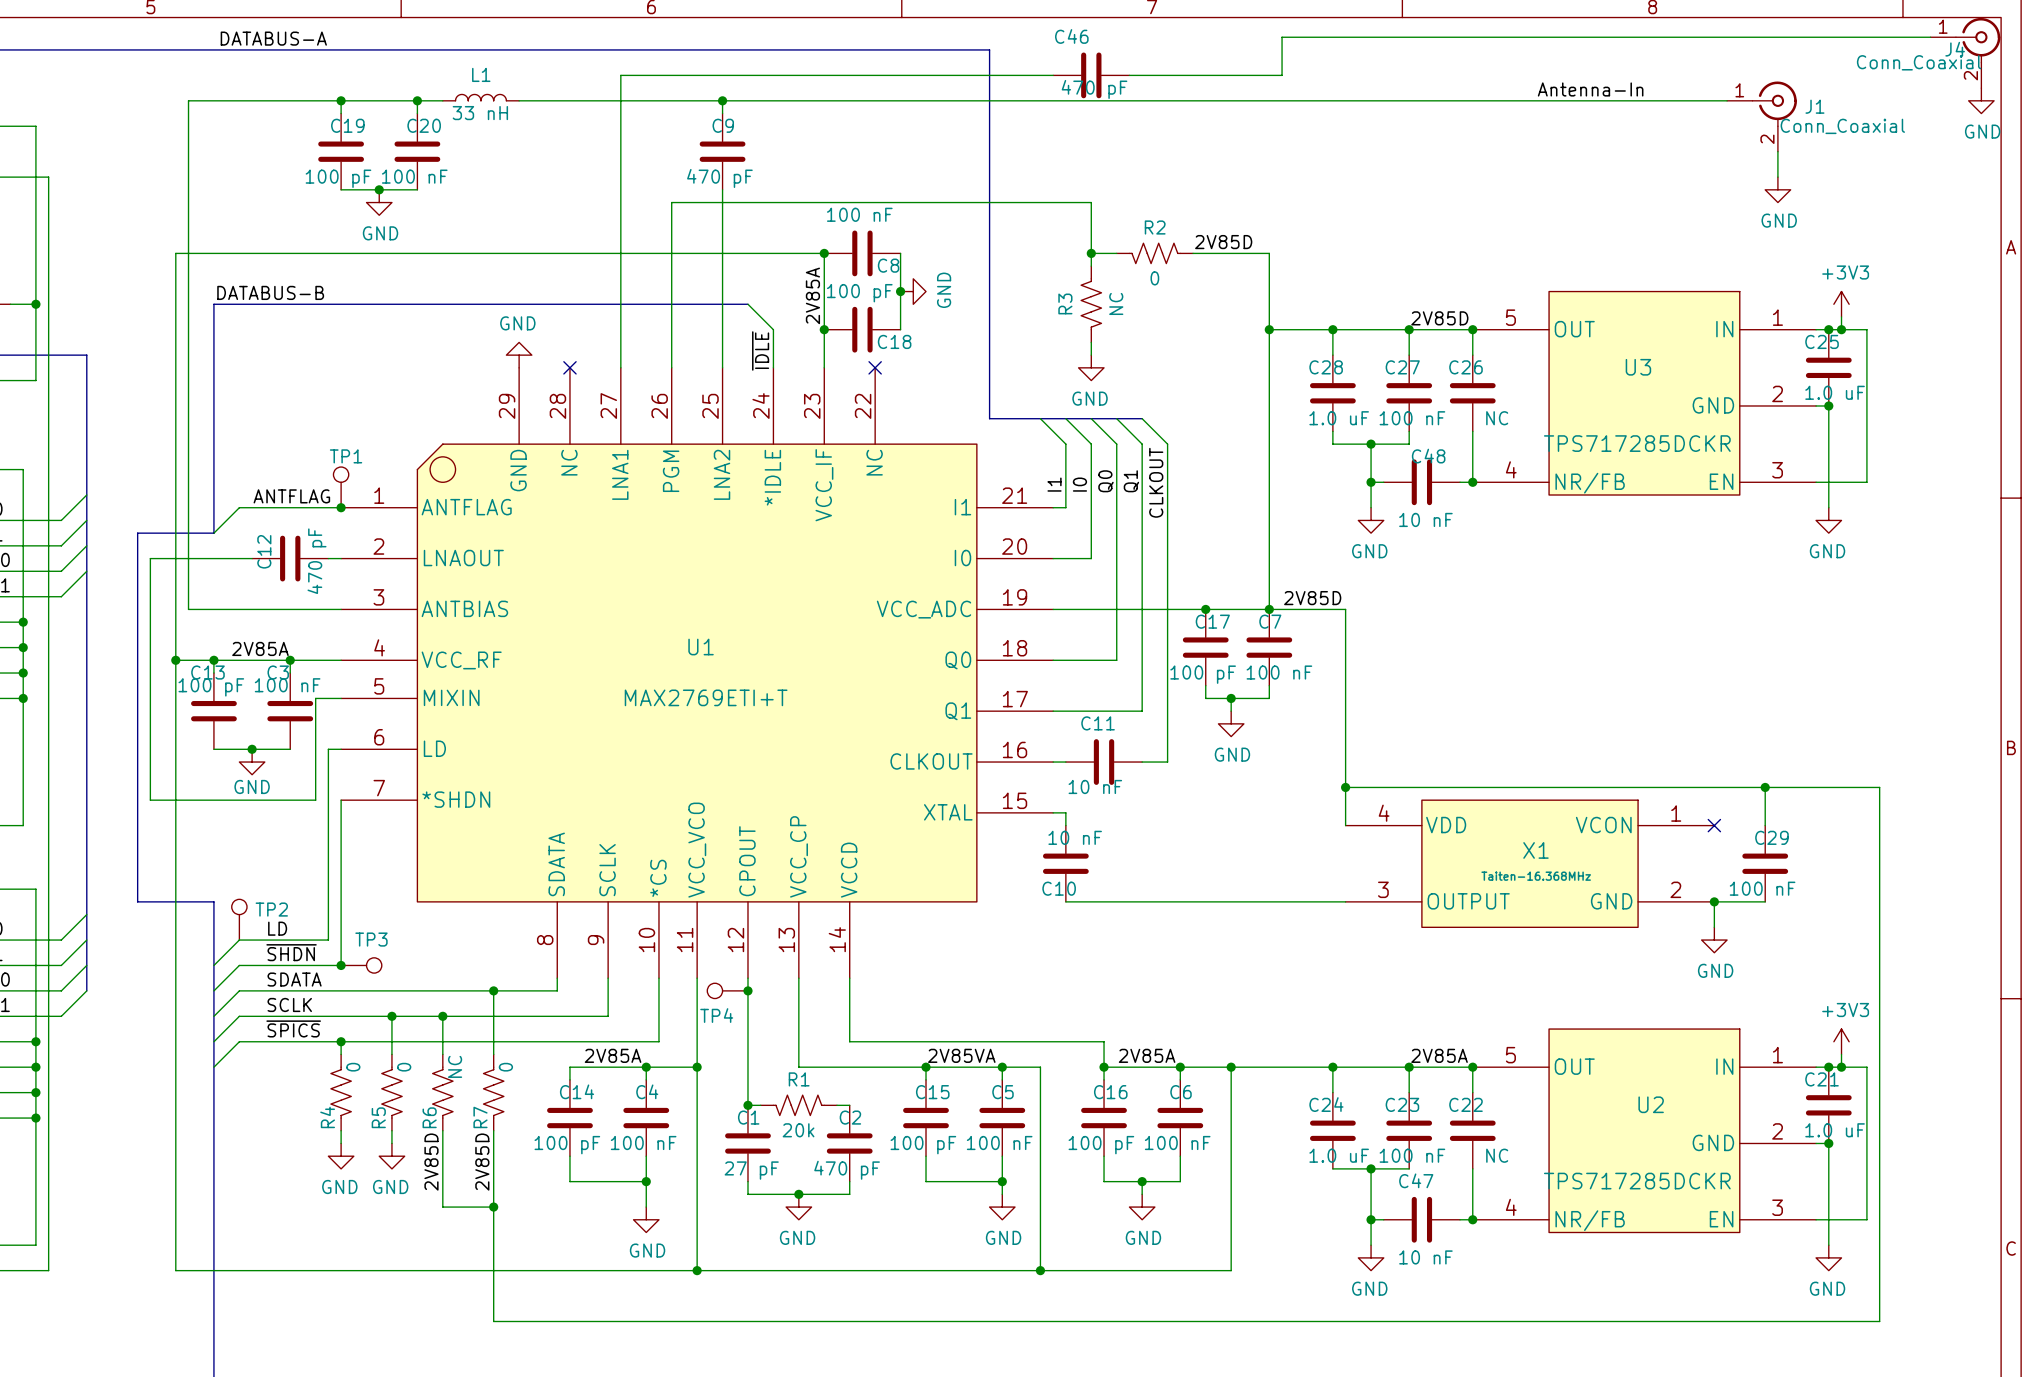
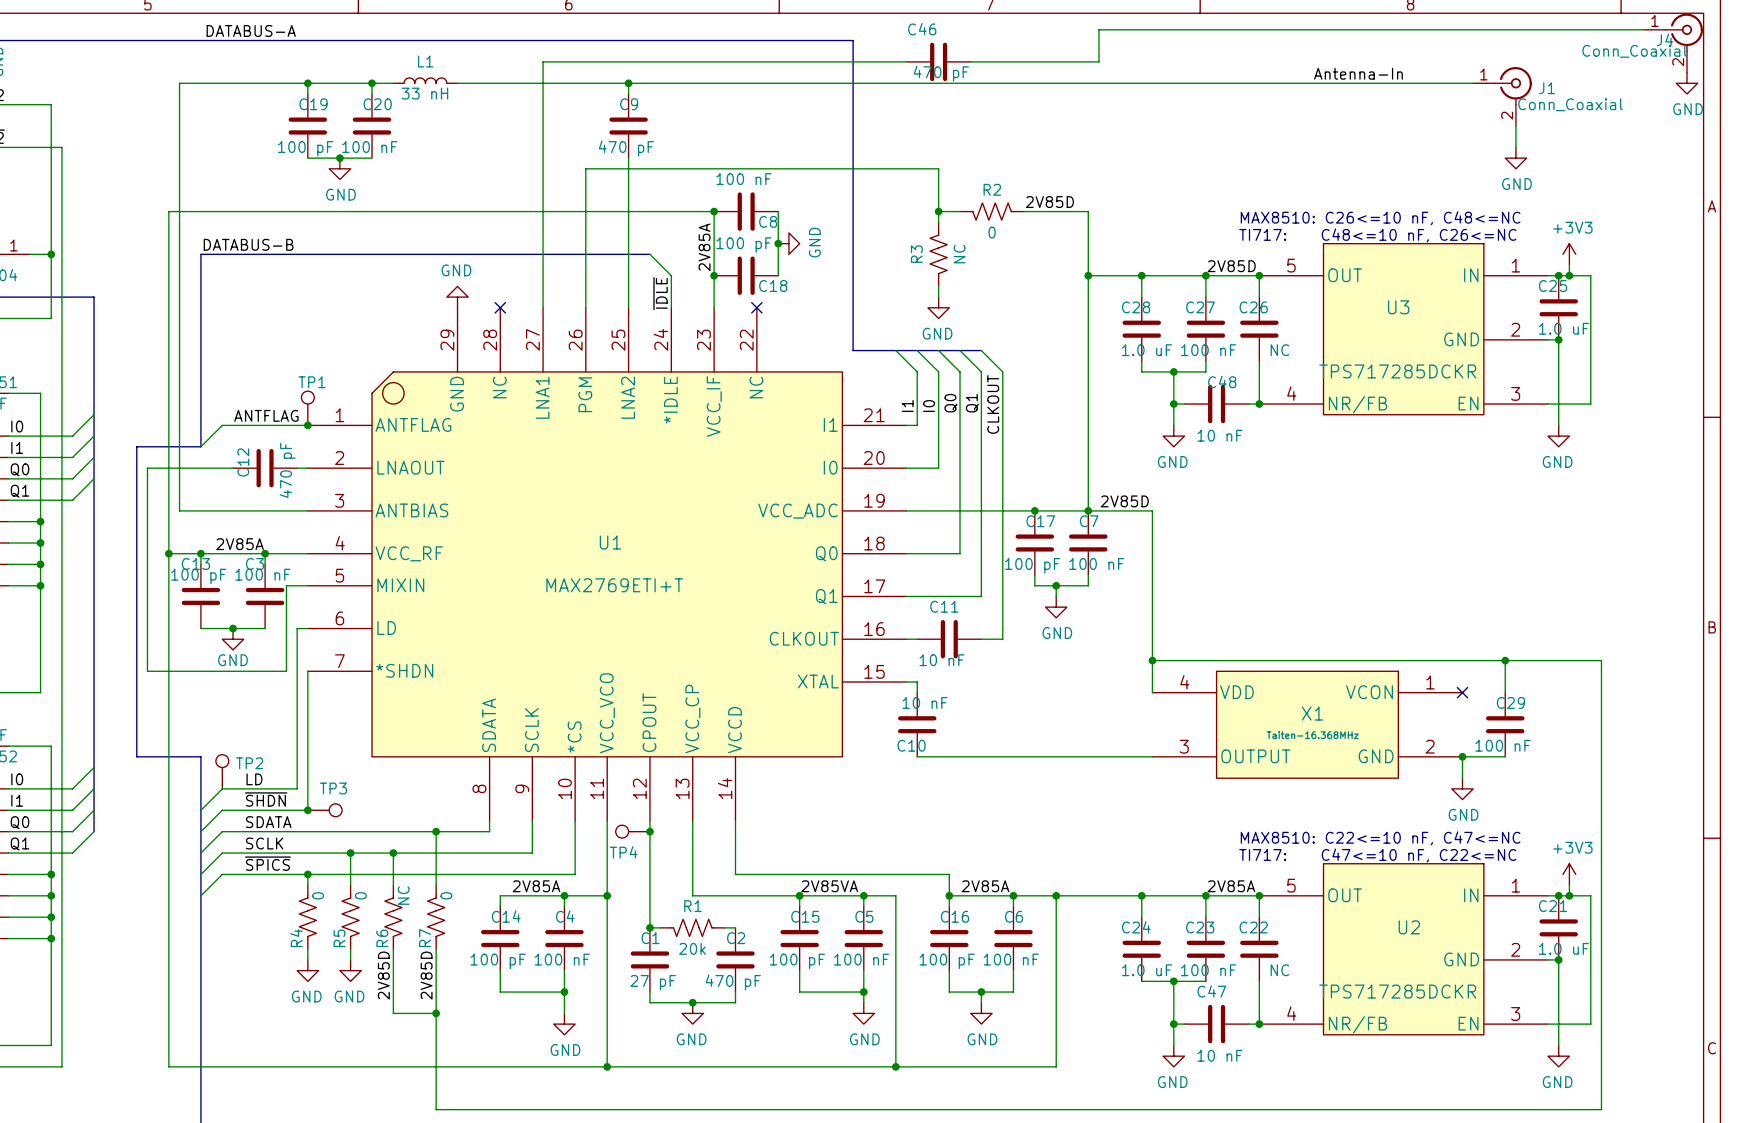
text: none -> MAX8510: C26<=10 nF, C48<=NC (1380, 218)
text: none -> TI717: C48<=10 nF, C26<=NC (1377, 235)
text: none -> MAX8510: C22<=10 nF, C47<=NC (1380, 838)
text: none -> TI717: C47<=10 nF, C22<=NC (1377, 855)

